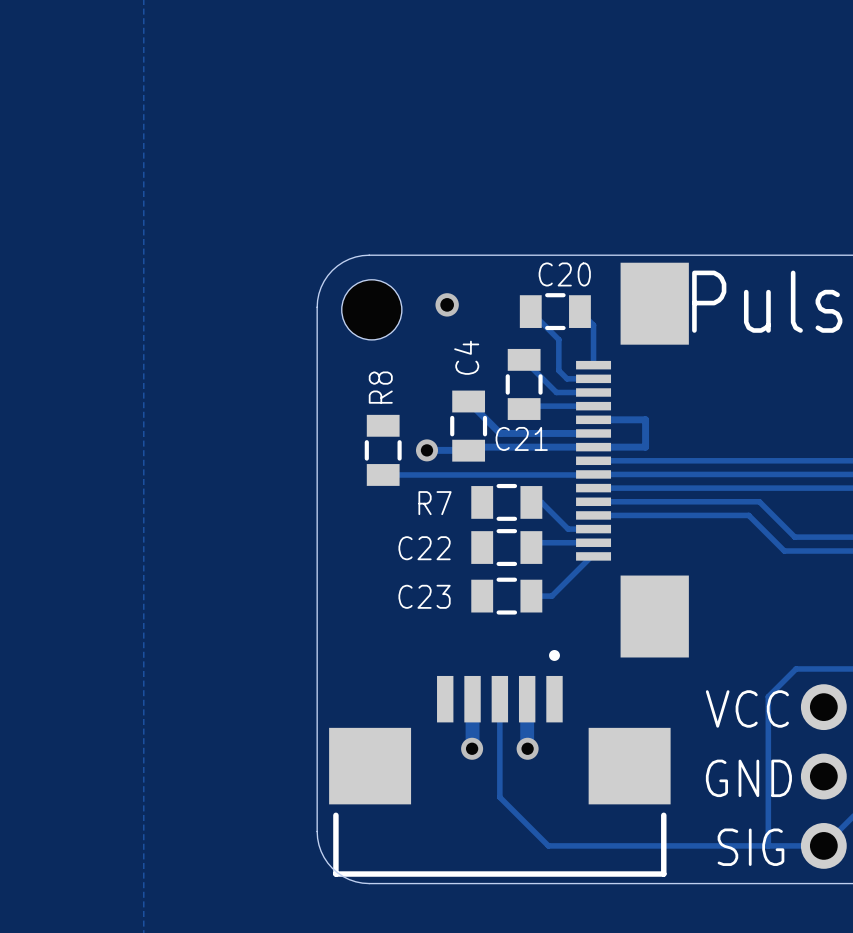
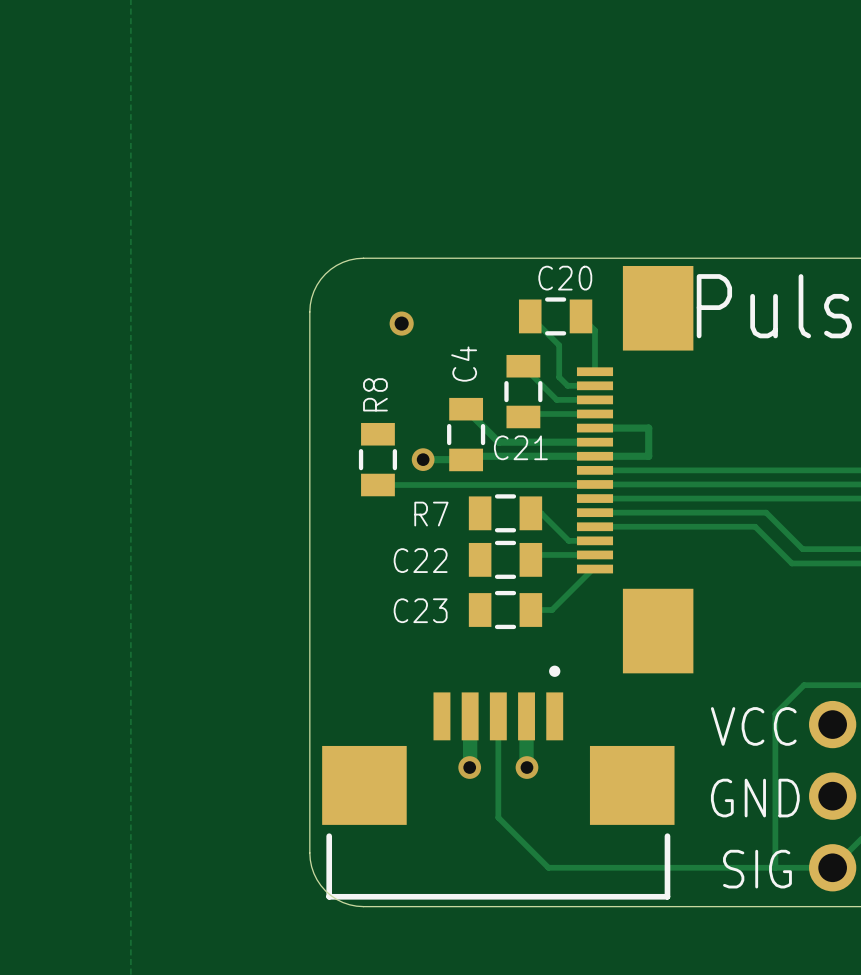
via position: (447, 304) -> (401, 323)
part: (371, 309) -> none

